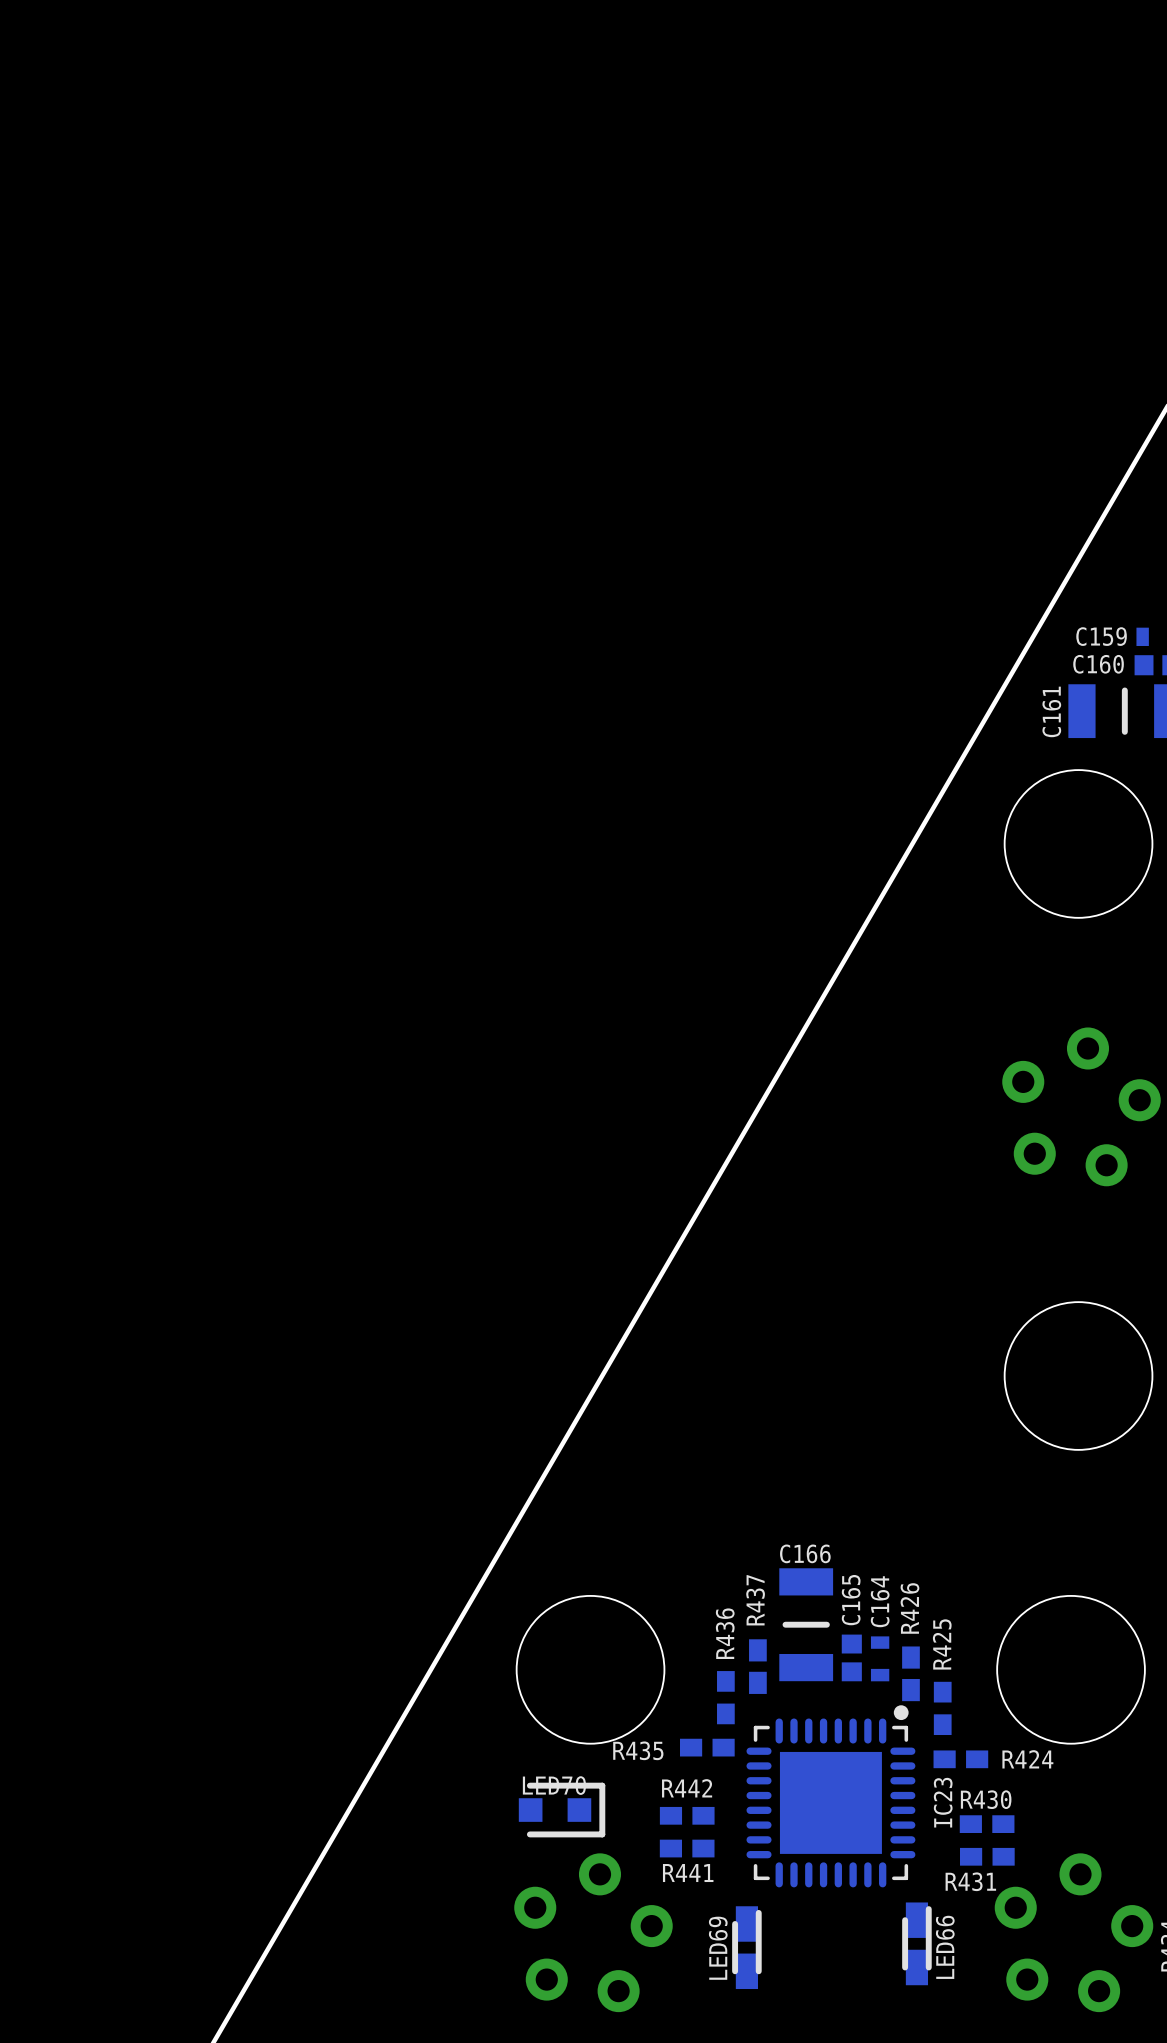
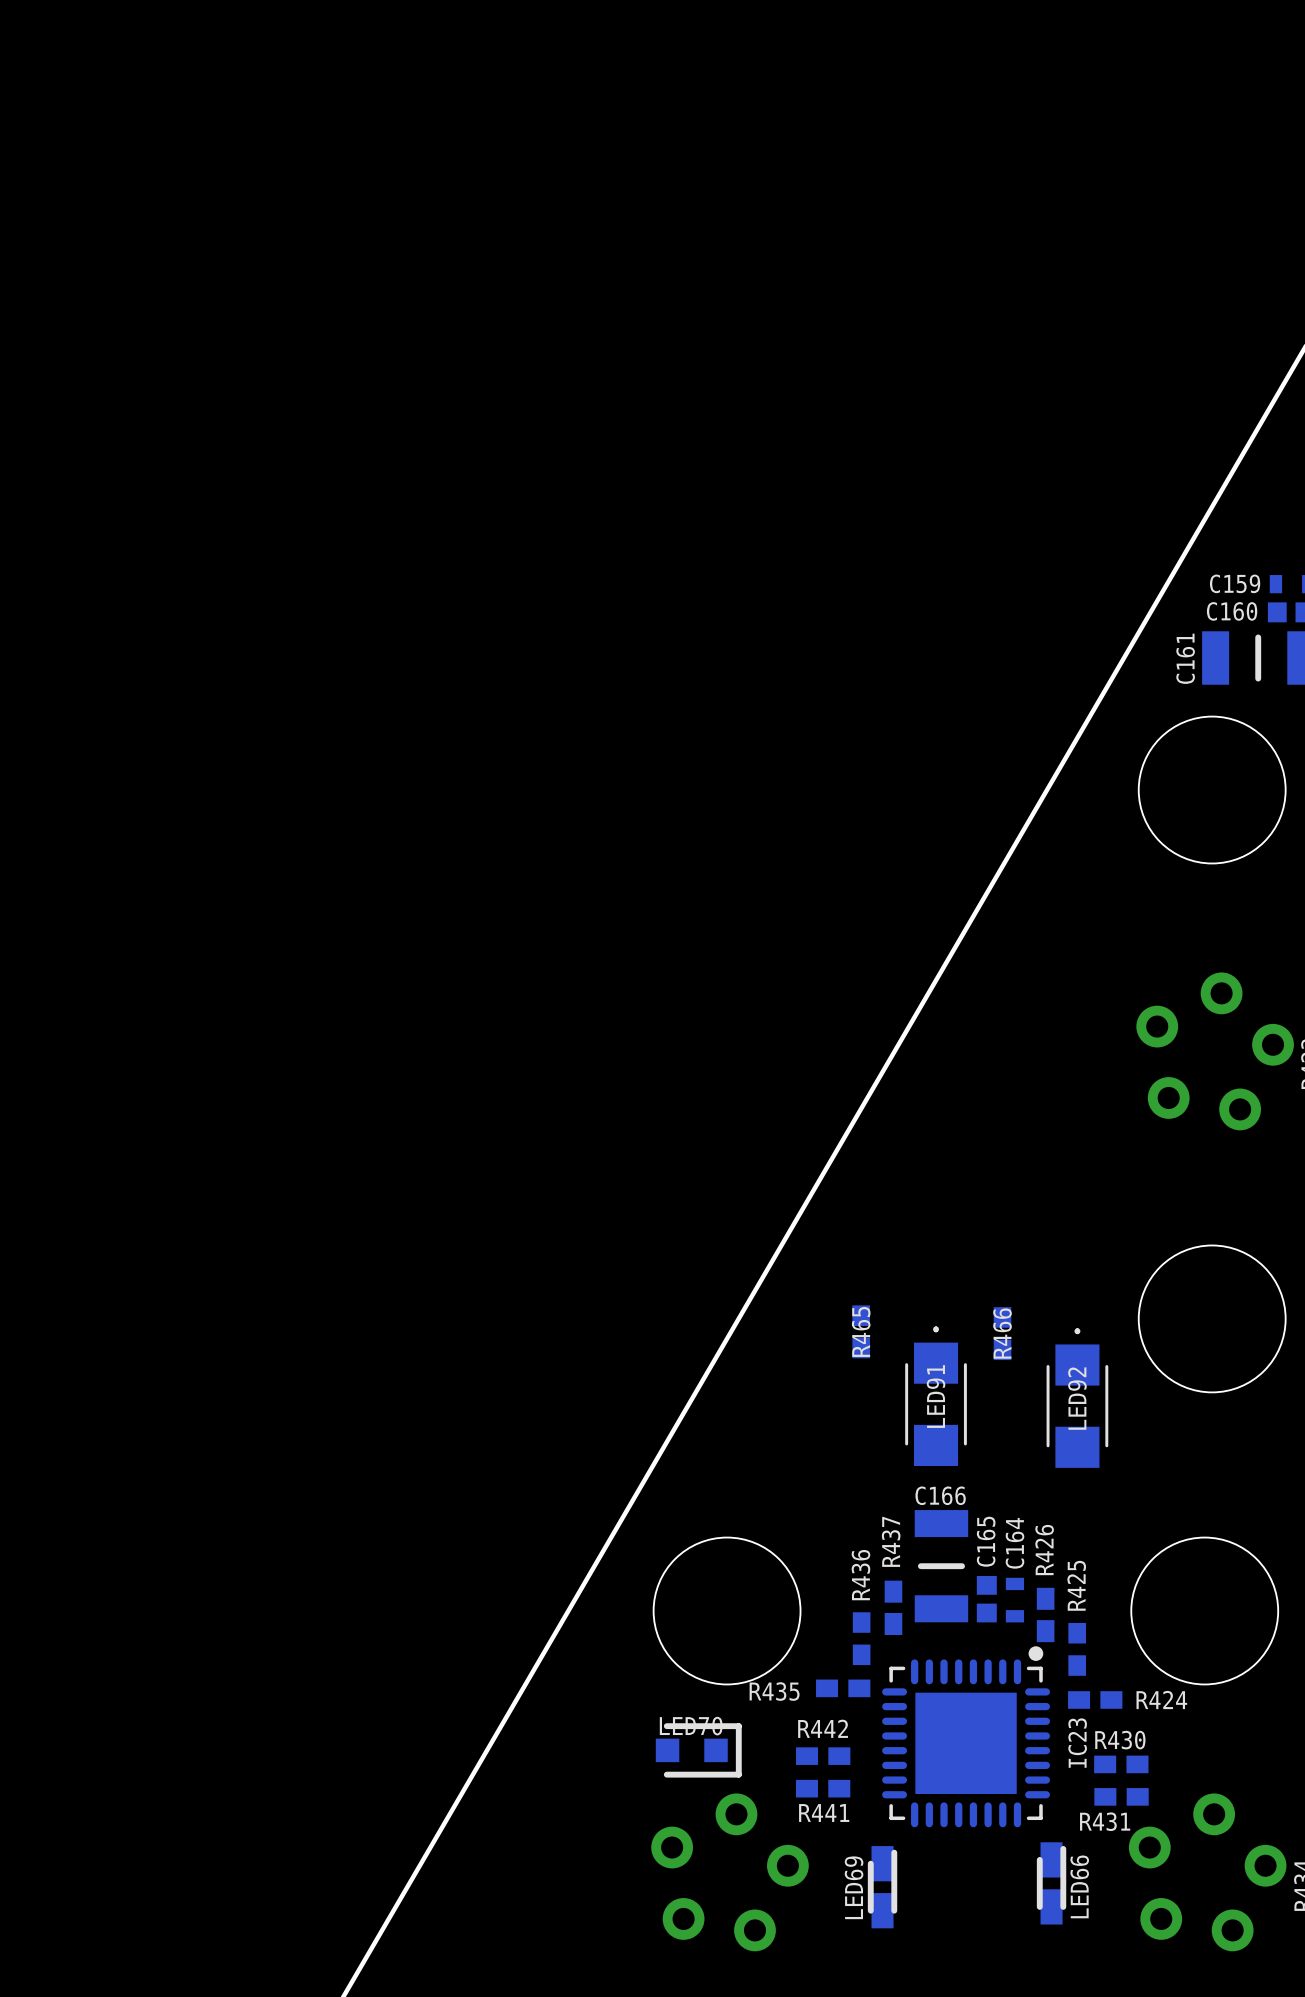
R465: none -> (861, 1331)
R466: none -> (1002, 1333)
LED91: none -> (936, 1396)
LED92: none -> (1077, 1398)

